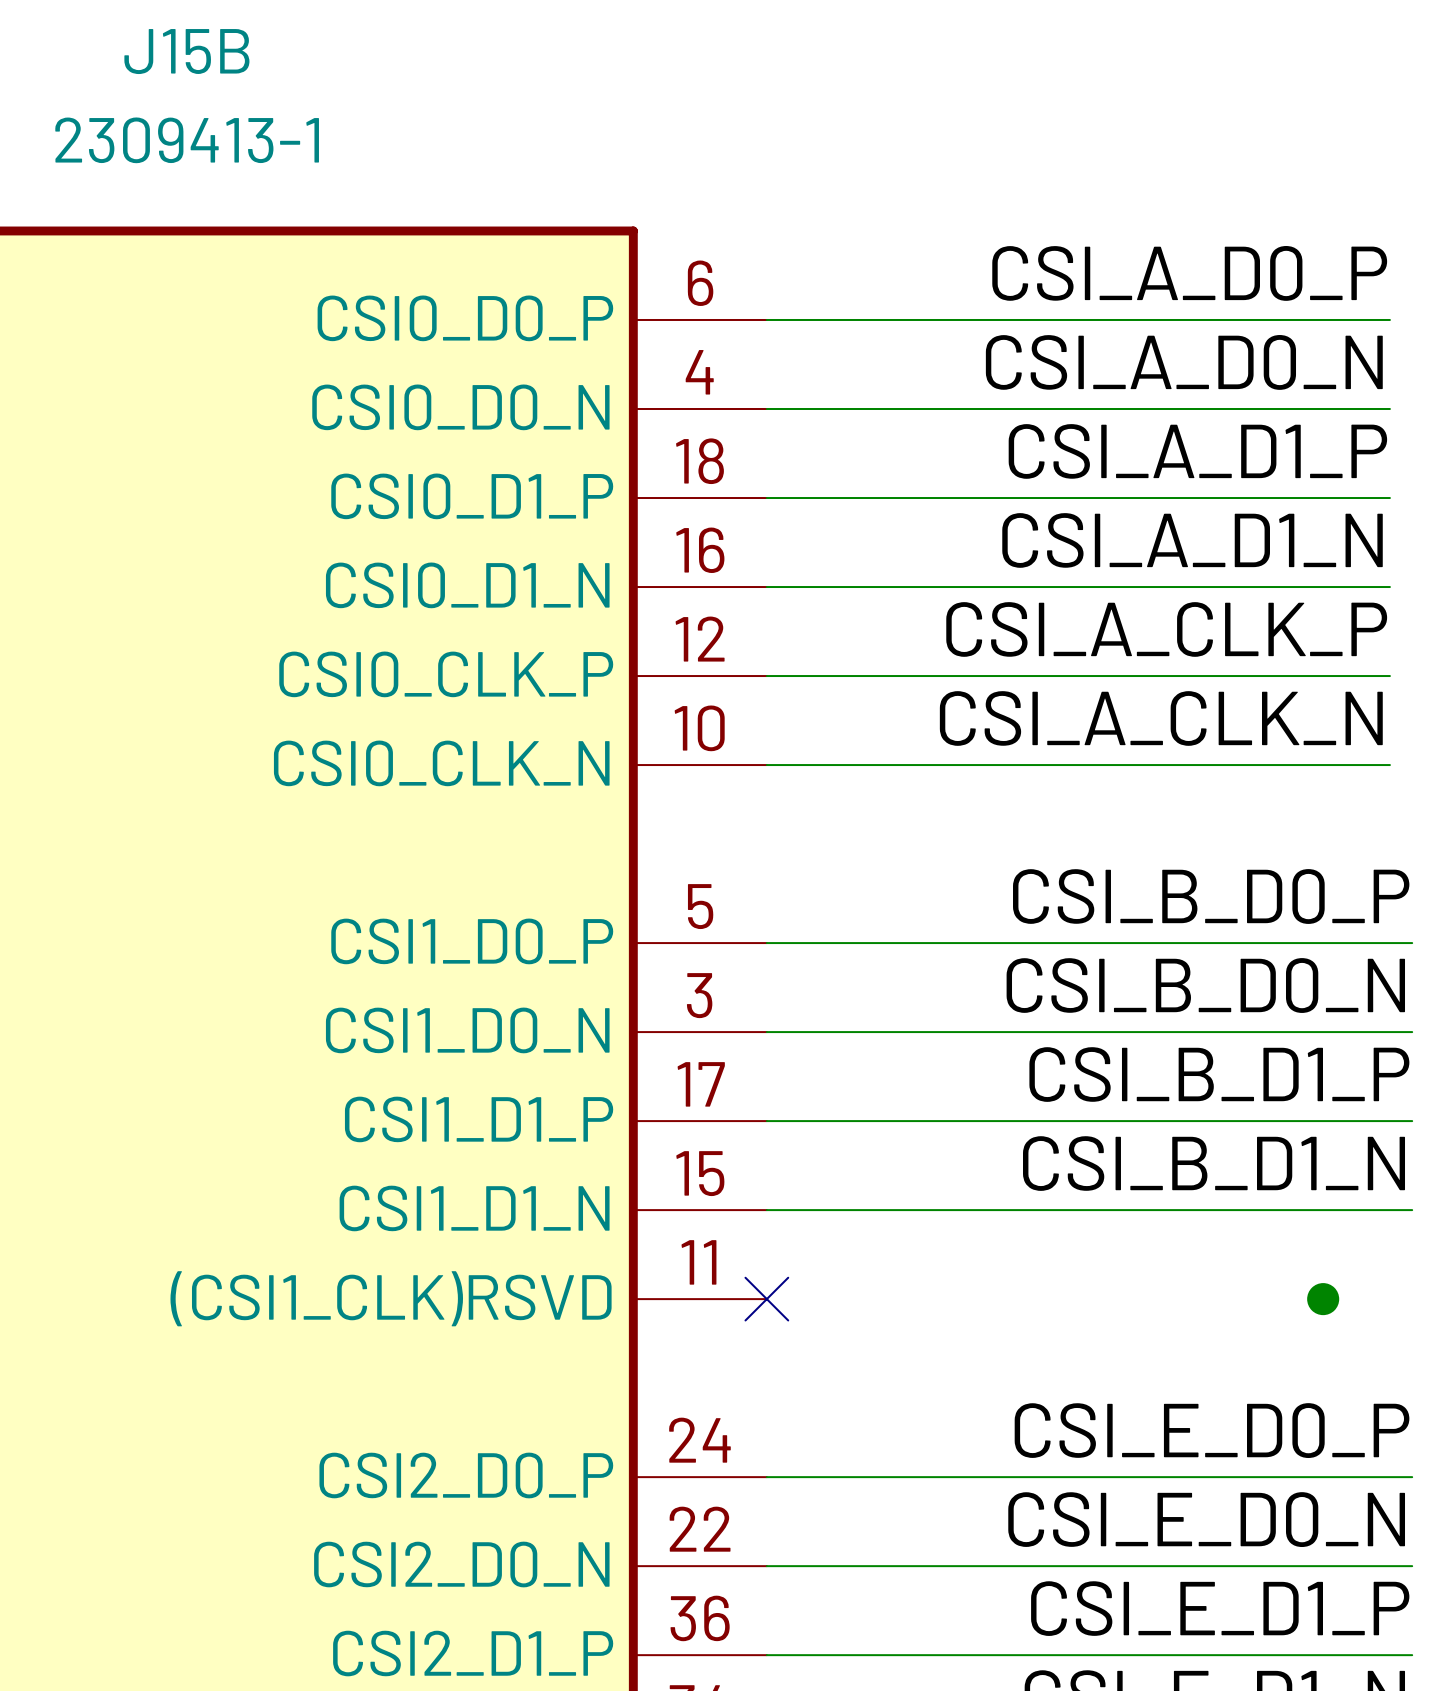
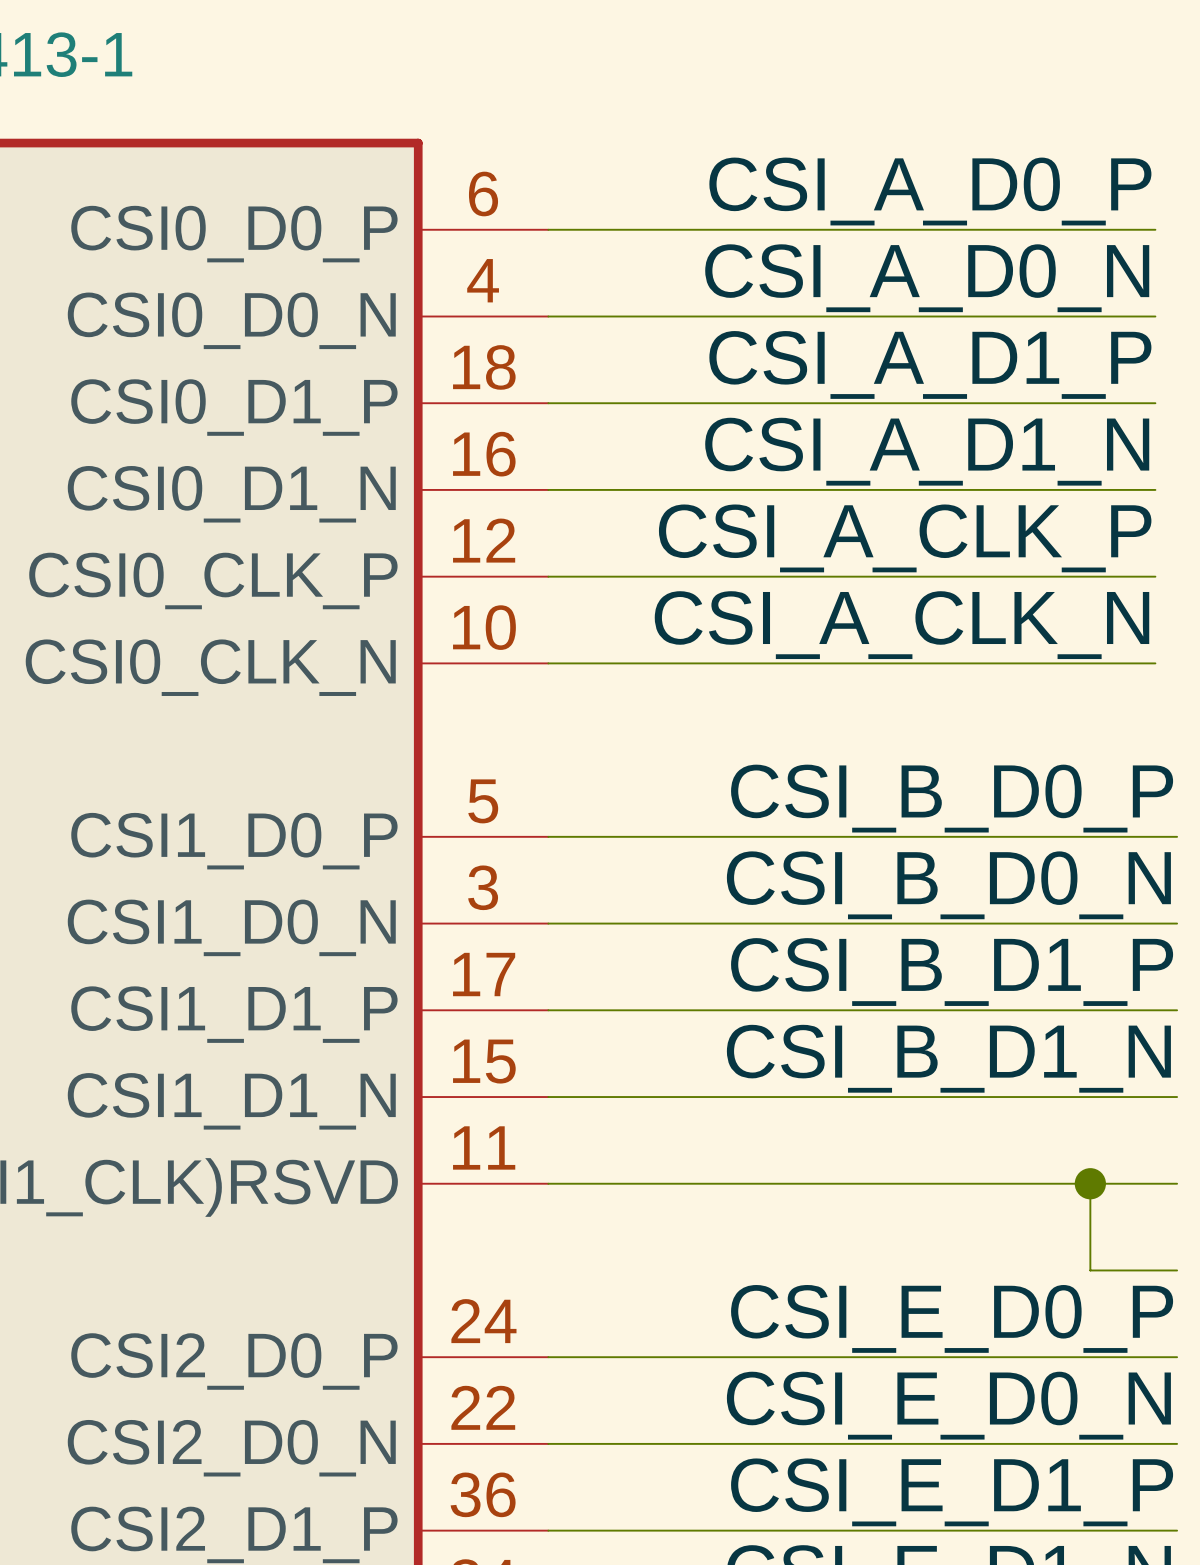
wire: none -> (548, 1183) (1177, 1183)
no-connect mark: (766, 1299) -> none
wire: none -> (1090, 1183) (1090, 1270) (1177, 1270)

